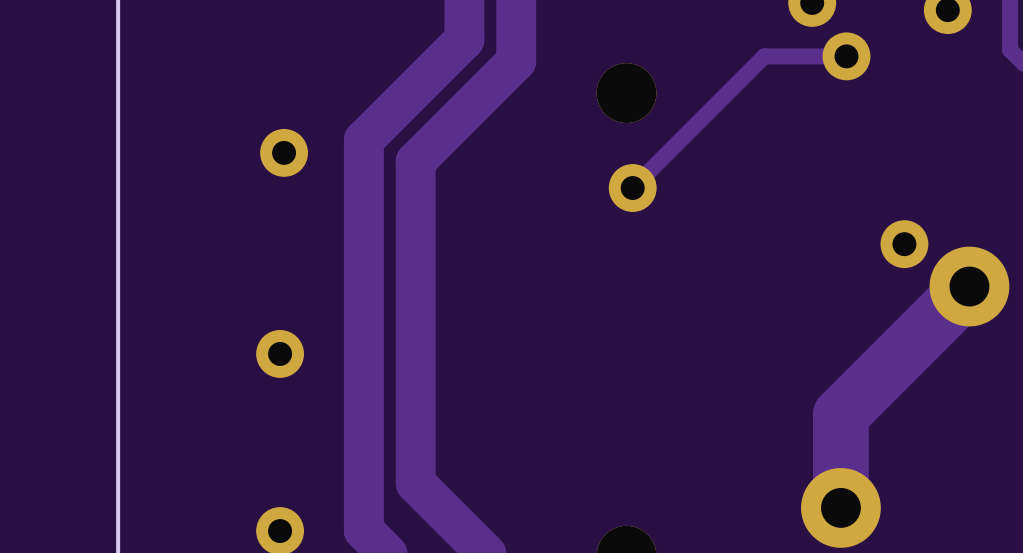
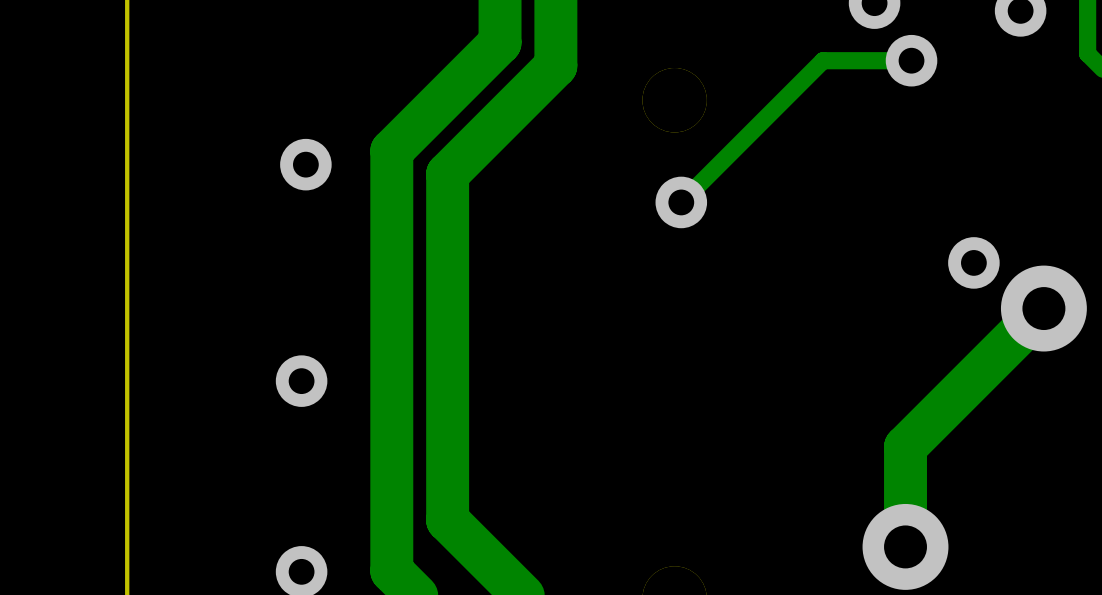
track width: thick (969, 286) (840, 415) (840, 507) -> thin (1043, 308) (905, 446) (905, 546)

